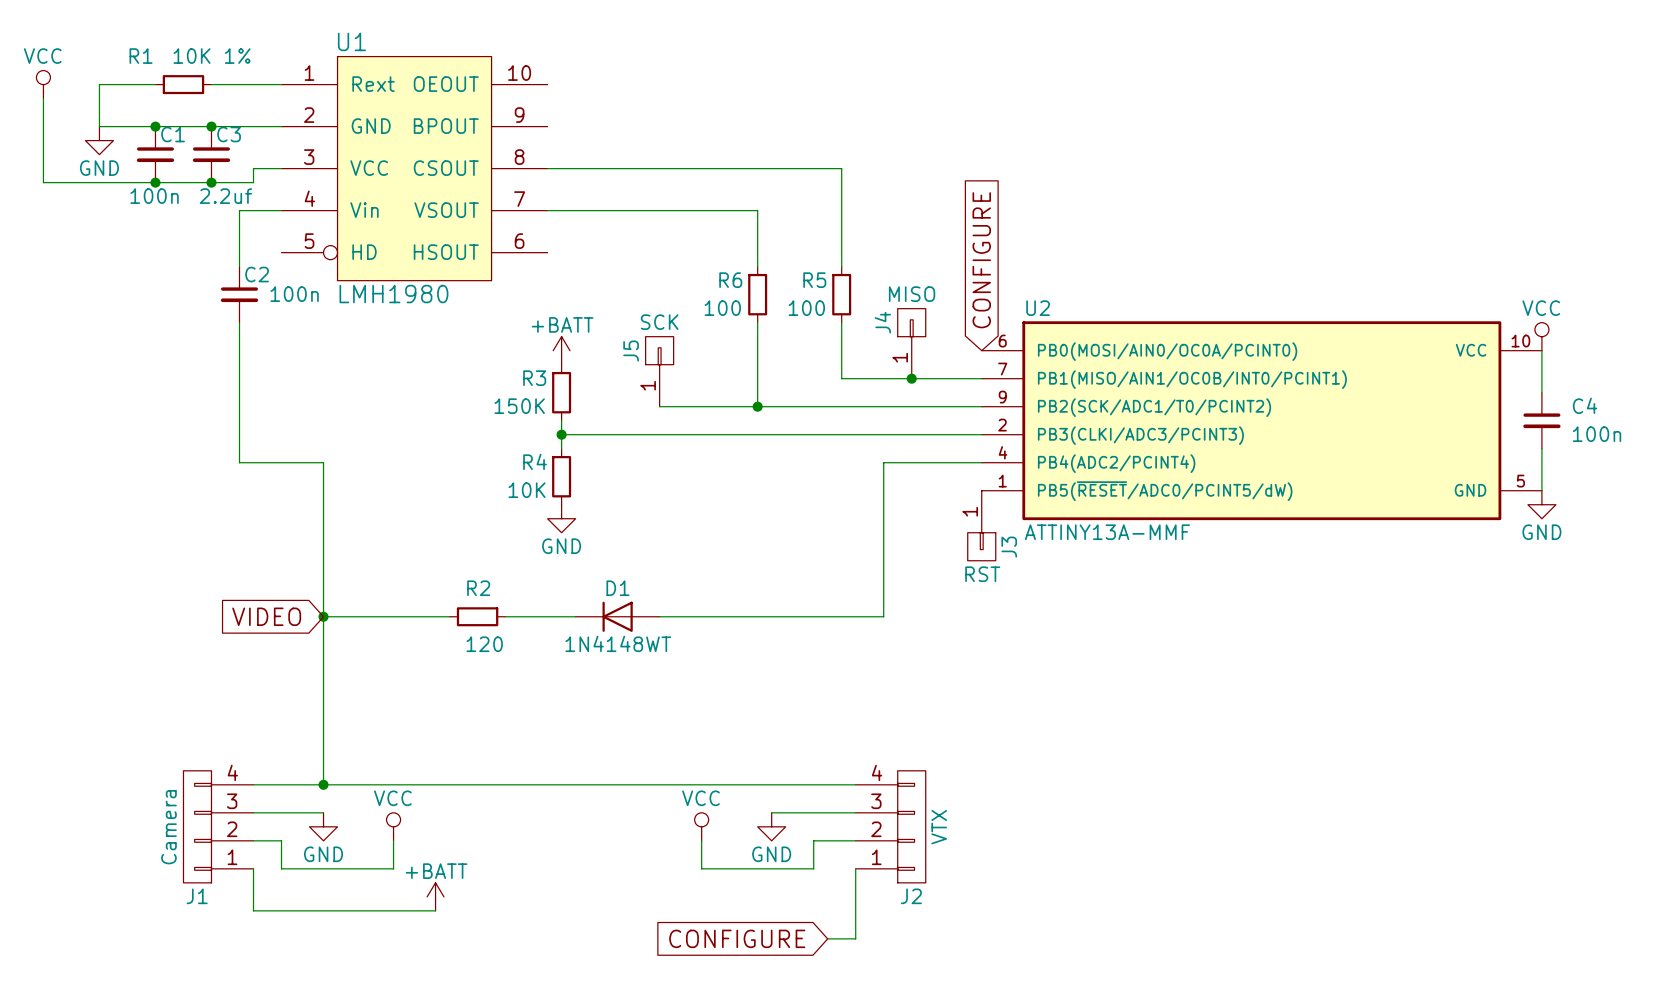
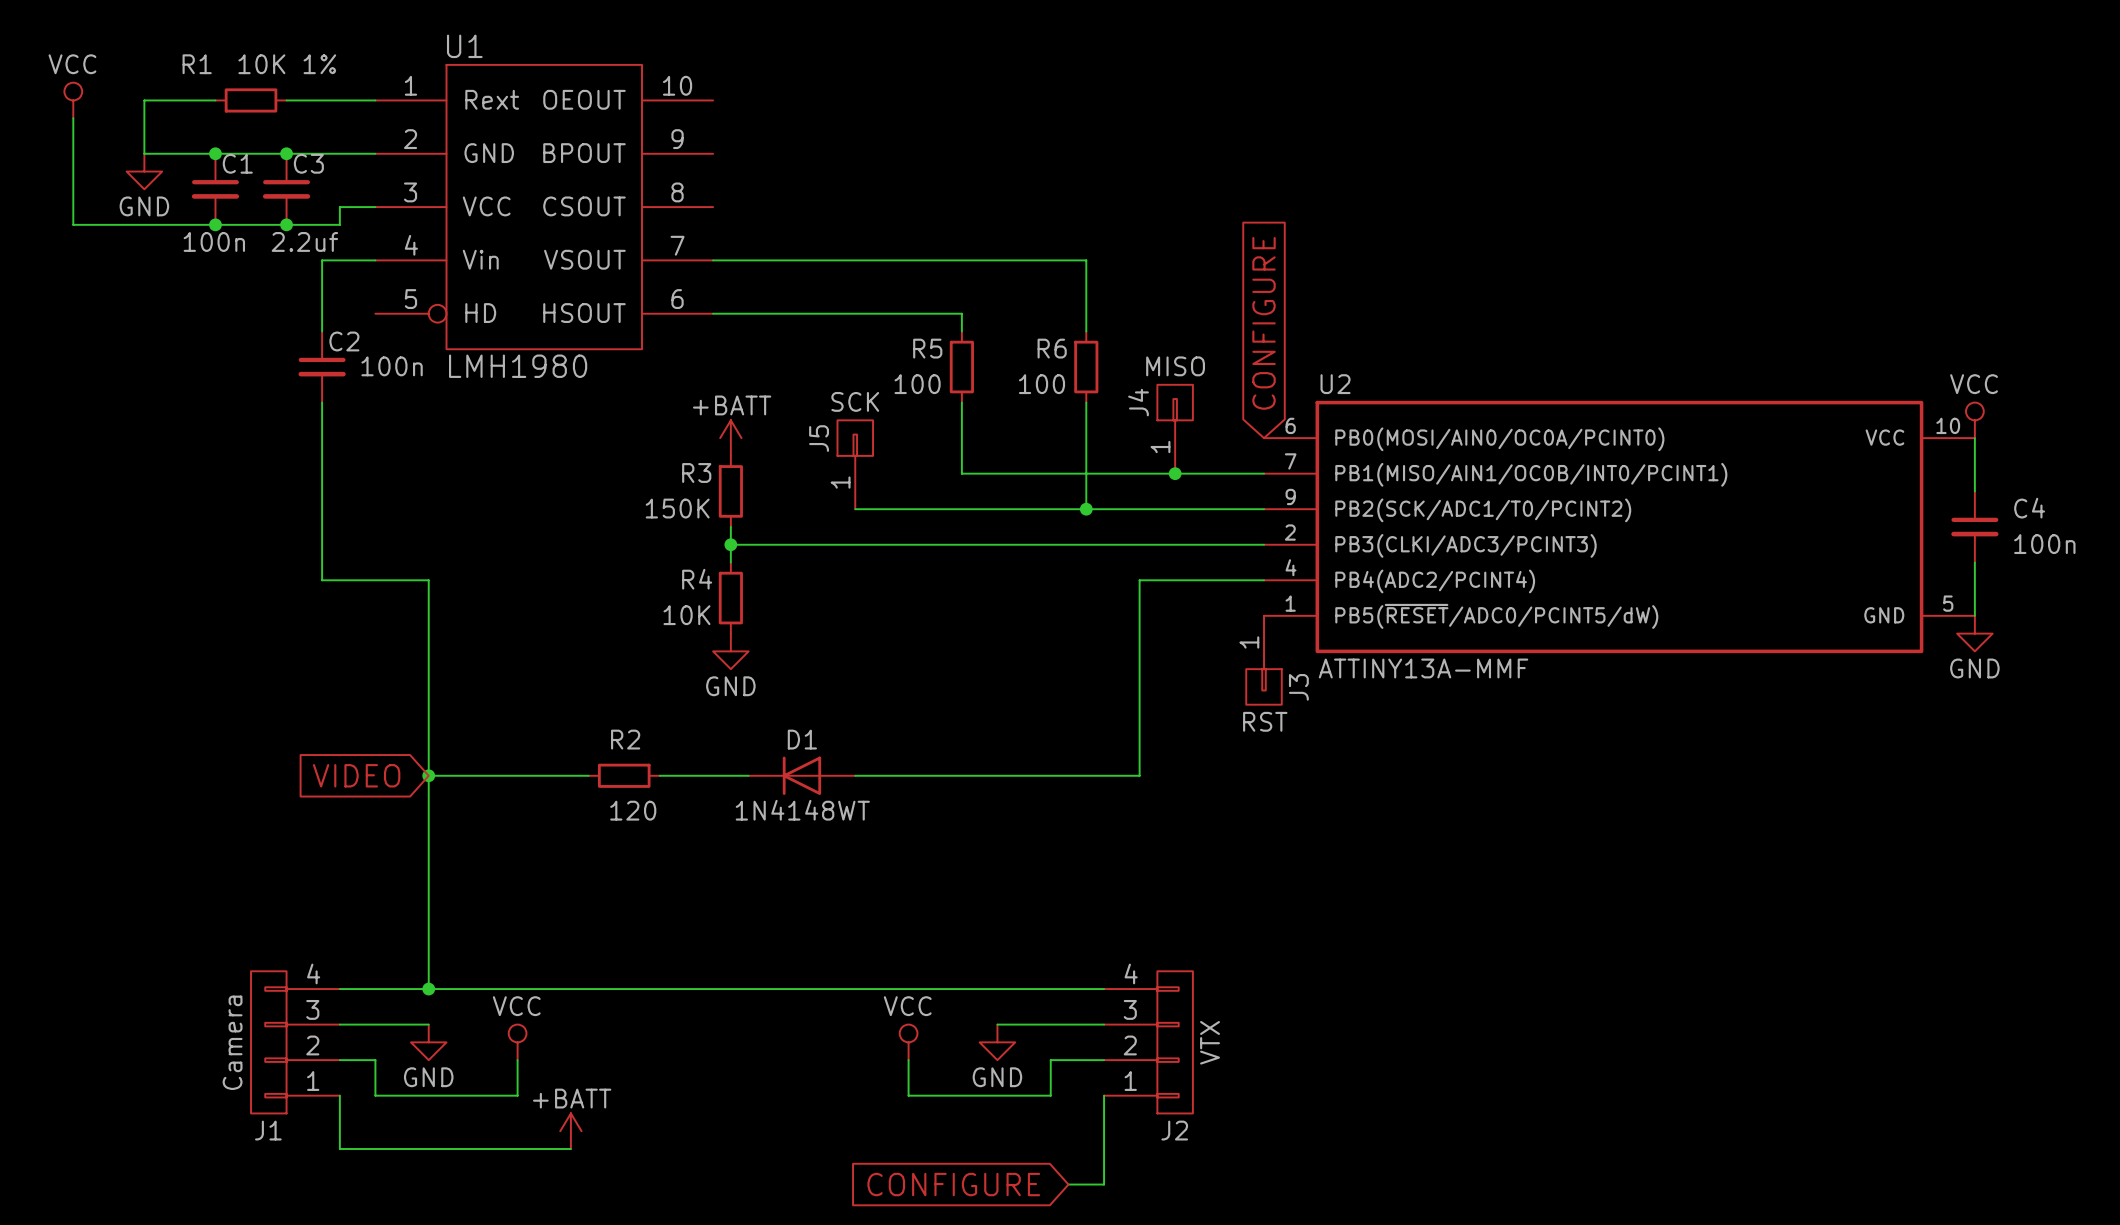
wire: (547, 168) (841, 168) (841, 210) -> none
wire: (757, 210) (757, 266) -> (979, 260) (1086, 260)
wire: none -> (713, 313) (961, 313) (961, 331)
R5 name: R5 (814, 280) -> R6 (1052, 348)
R5: none -> 100 (961, 367)
R6: 100 (757, 294) -> none
wire: none -> (961, 402) (961, 473) (1086, 473) (1086, 509)
wire: (757, 322) (757, 406) -> none
junction: (757, 406) -> none
junction: none -> (1086, 509)

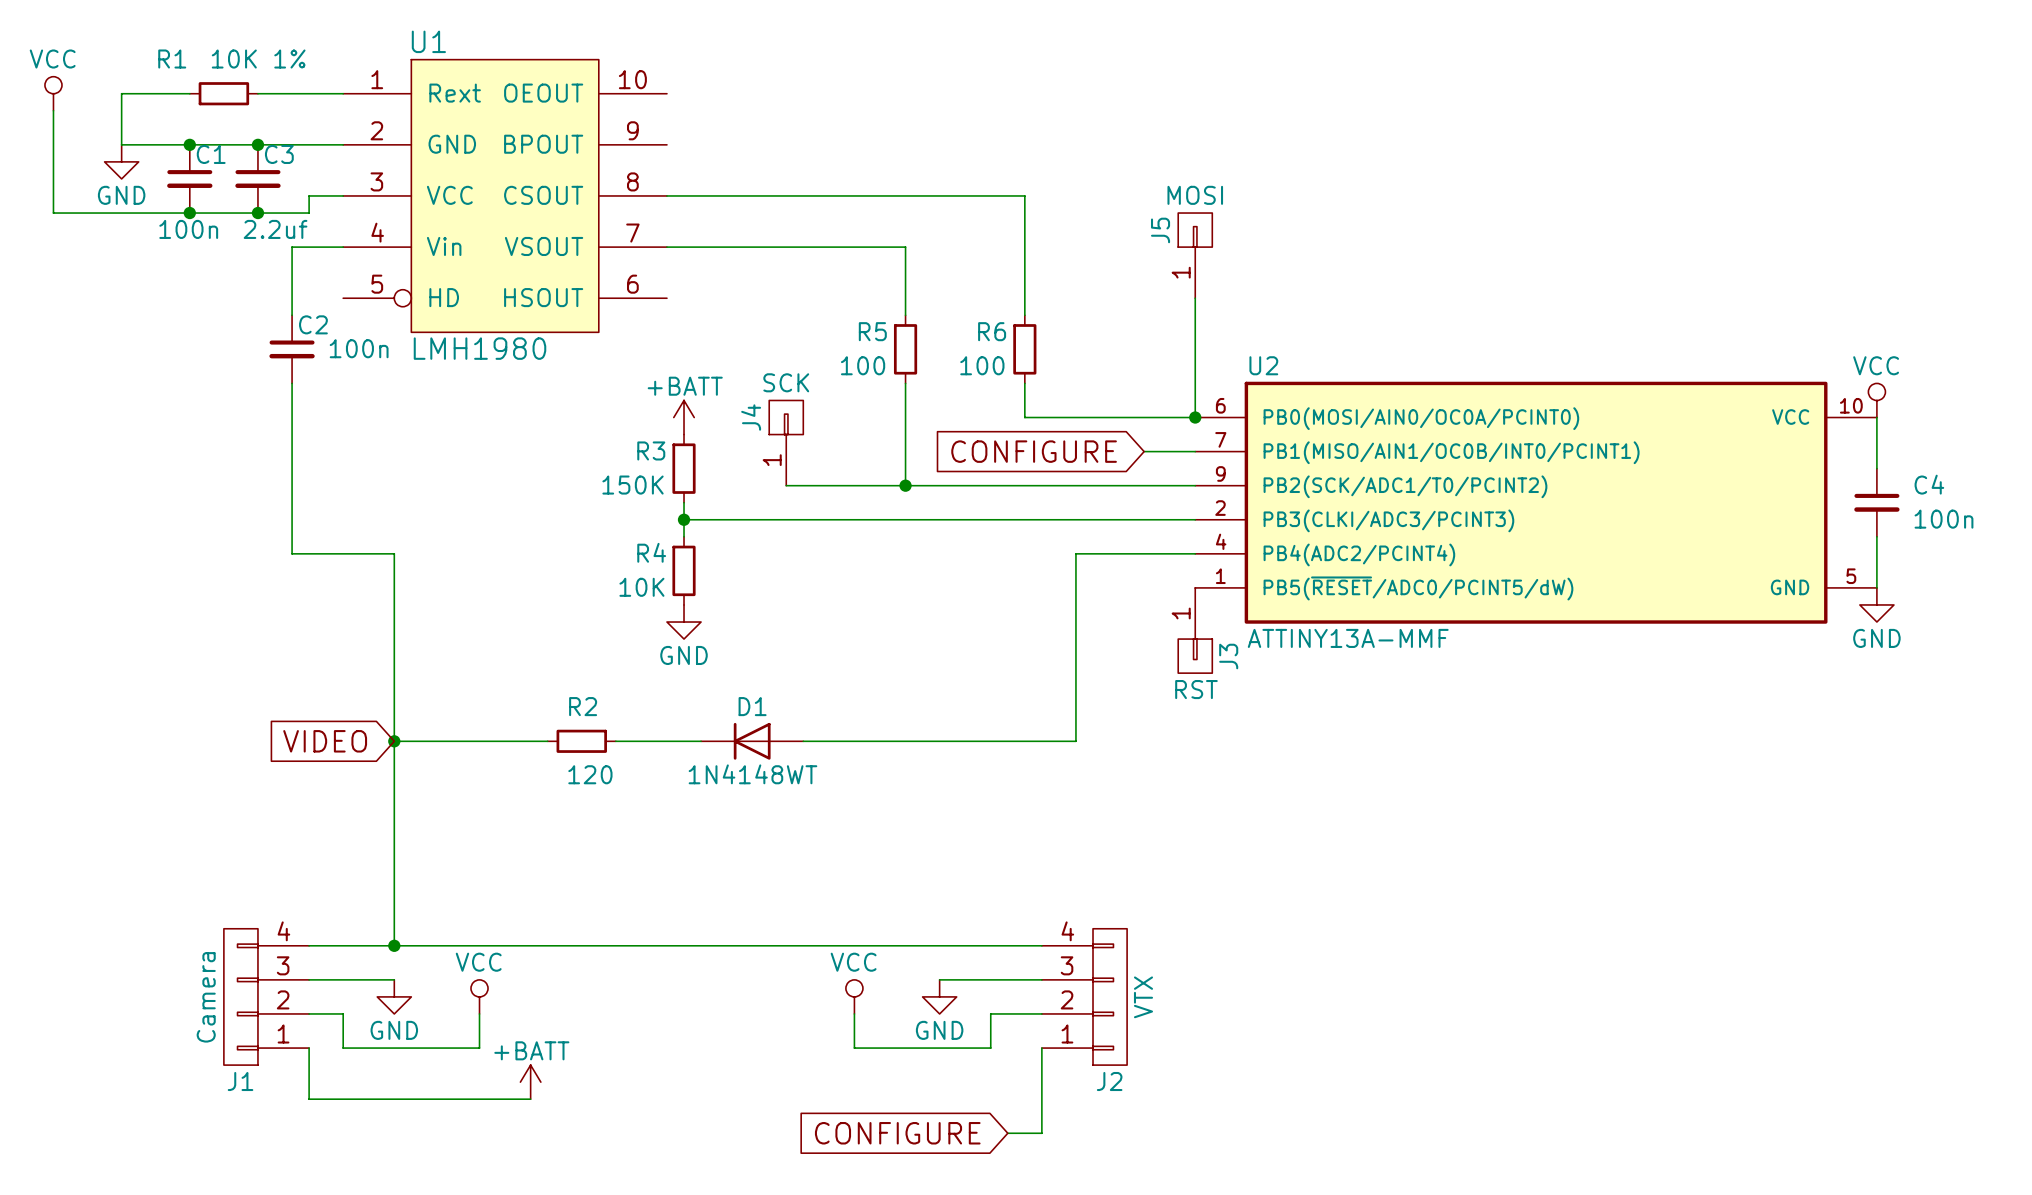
wire: none -> (666, 195) (1024, 195) (1024, 247)
wire: (961, 260) (1086, 260) -> (905, 247) (905, 298)
wire: (713, 313) (961, 313) -> none
global label rotation: 0° (1264, 323) -> 90° counterclockwise (1034, 451)
J4 value: MISO (1175, 366) -> SCK (786, 382)
J5 value: SCK (855, 401) -> MOSI (1195, 195)
J4 position: (1175, 429) -> (786, 443)
wire: (1086, 438) (1086, 509) -> (1024, 417) (1195, 417) (1195, 298)
junction: none -> (1195, 417)
J5 position: (855, 464) -> (1195, 255)
wire: (961, 473) (1210, 473) -> (905, 451) (905, 485)
junction: (1175, 473) -> none
wire: none -> (786, 485) (803, 485)
junction: none -> (905, 485)
junction: (1086, 509) -> none

